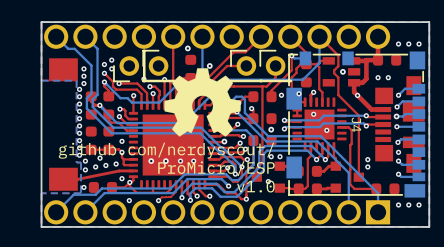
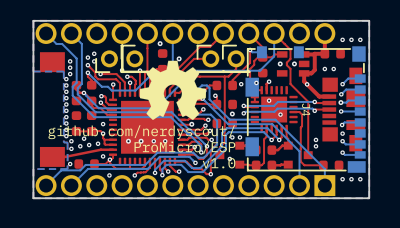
top track: (316, 64) (319, 67) (319, 89) (322, 92) (322, 102) -> none
via: none -> (280, 63)

